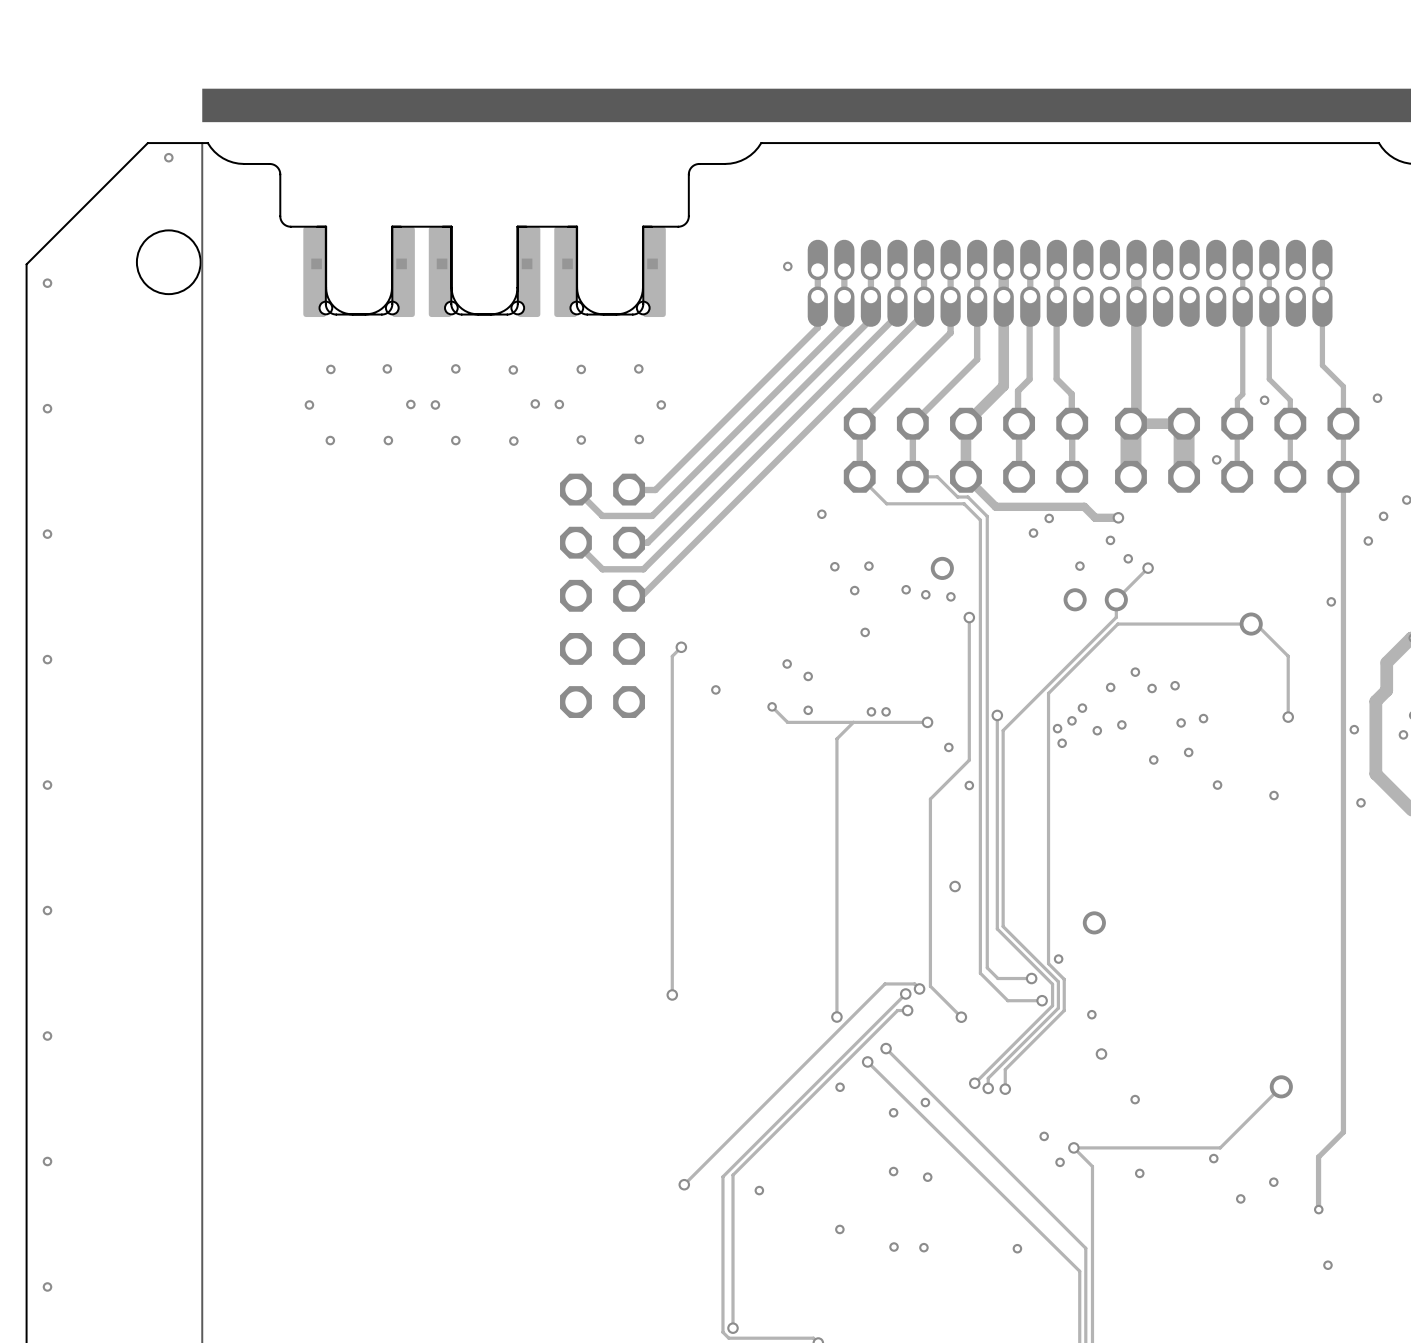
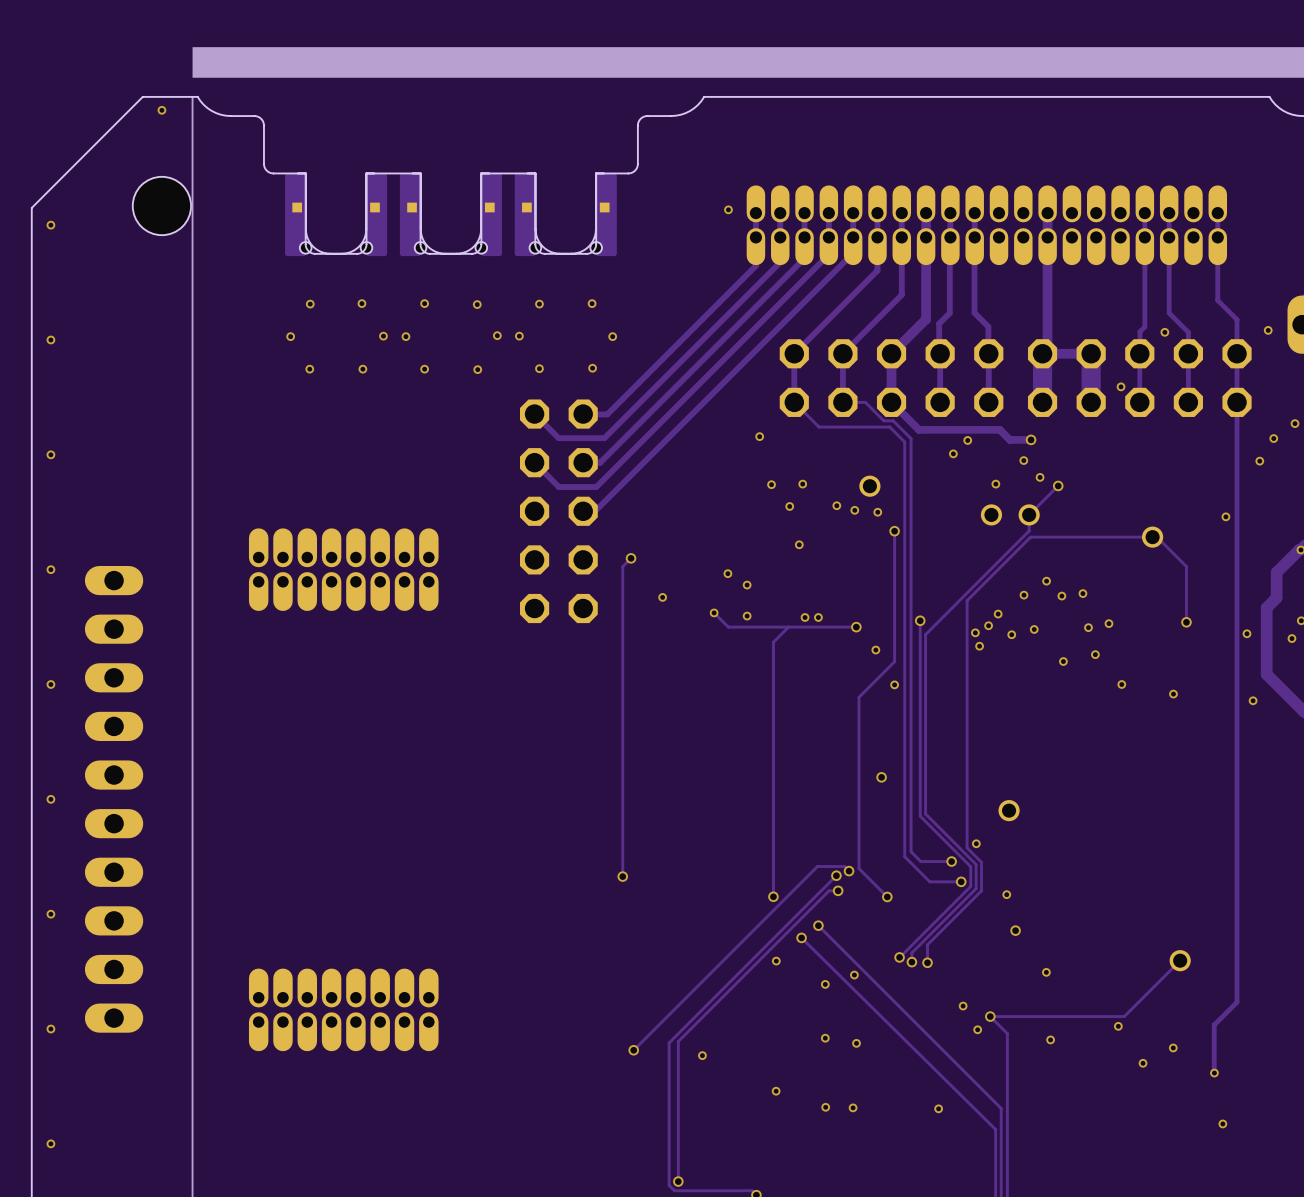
part: none -> (343, 569)
part: none -> (114, 799)
part: none -> (343, 1009)

